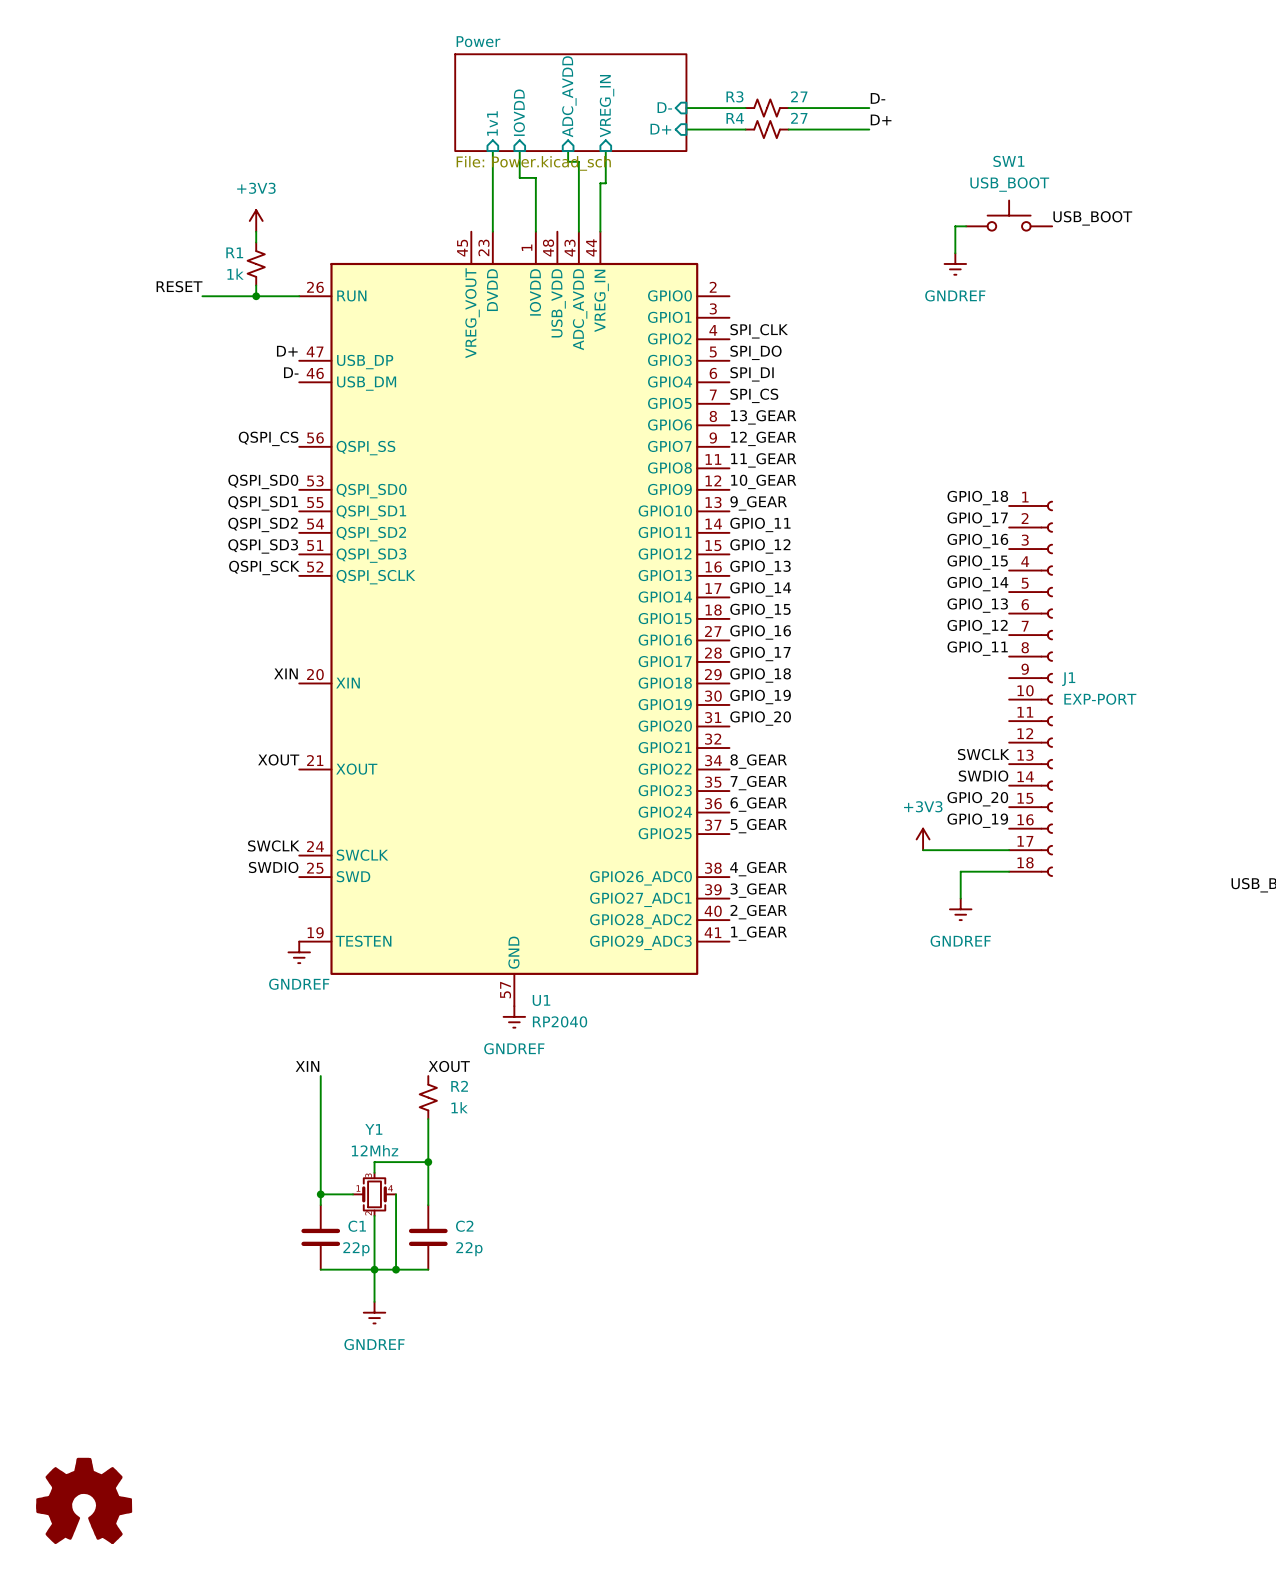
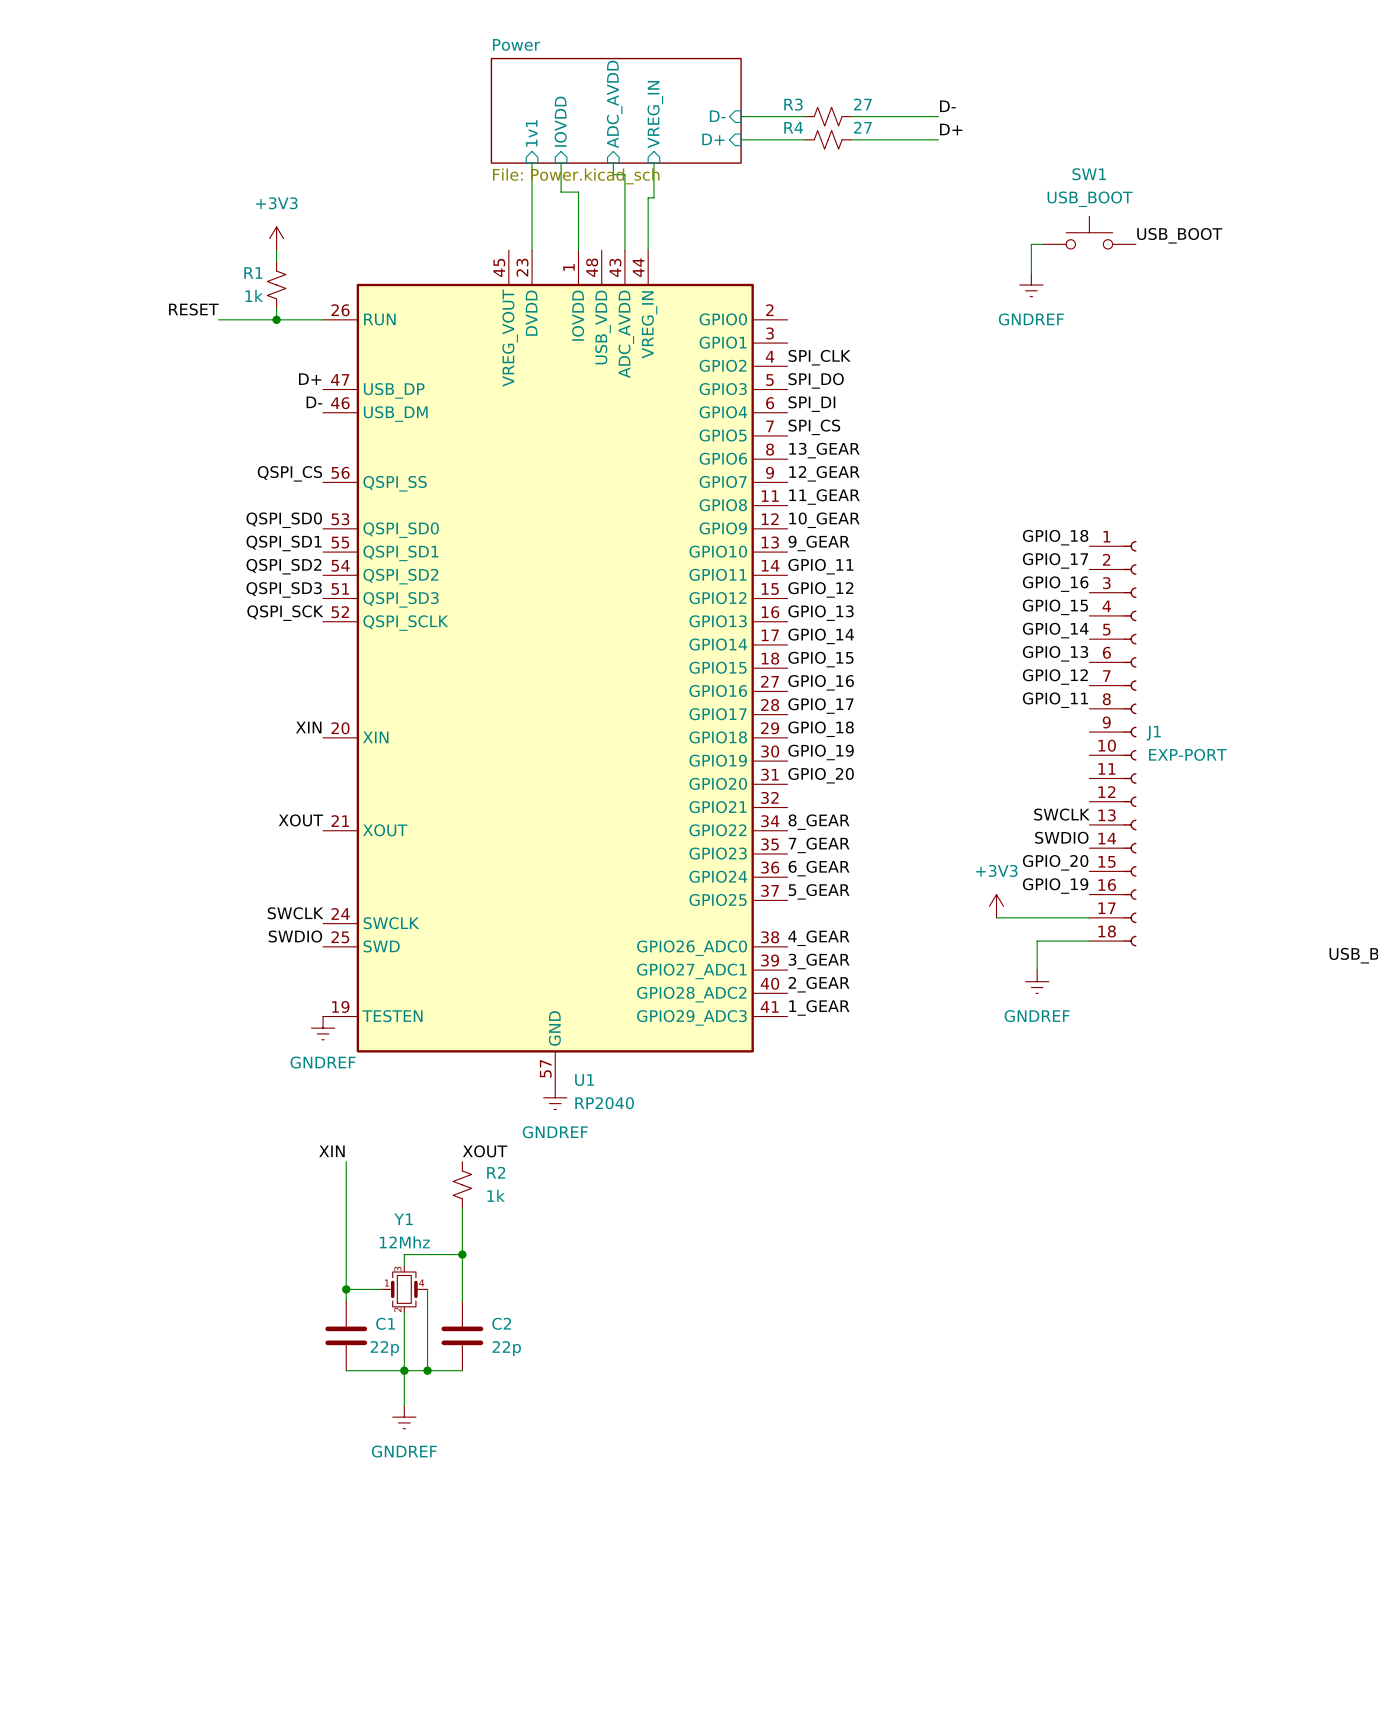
power symbol: (84, 1500) -> none

